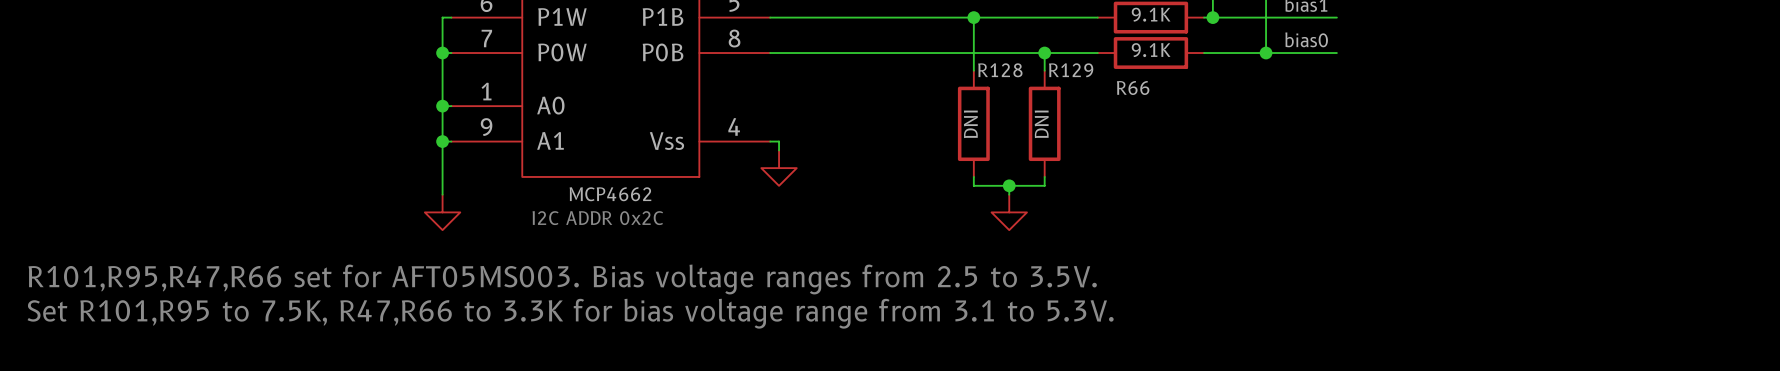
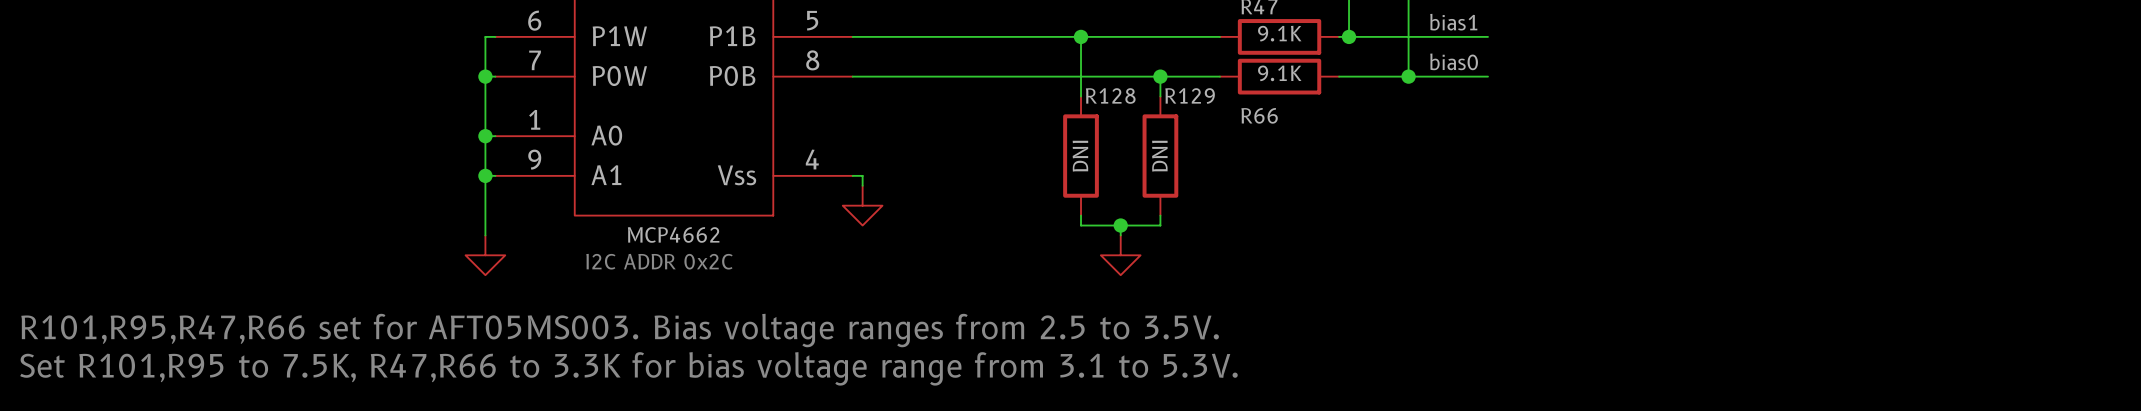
R128 text: none -> DNI (1080, 156)
R129 text: none -> DNI (1159, 156)
R128 value: DNI (970, 124) -> none
R129 value: DNI (1041, 124) -> none

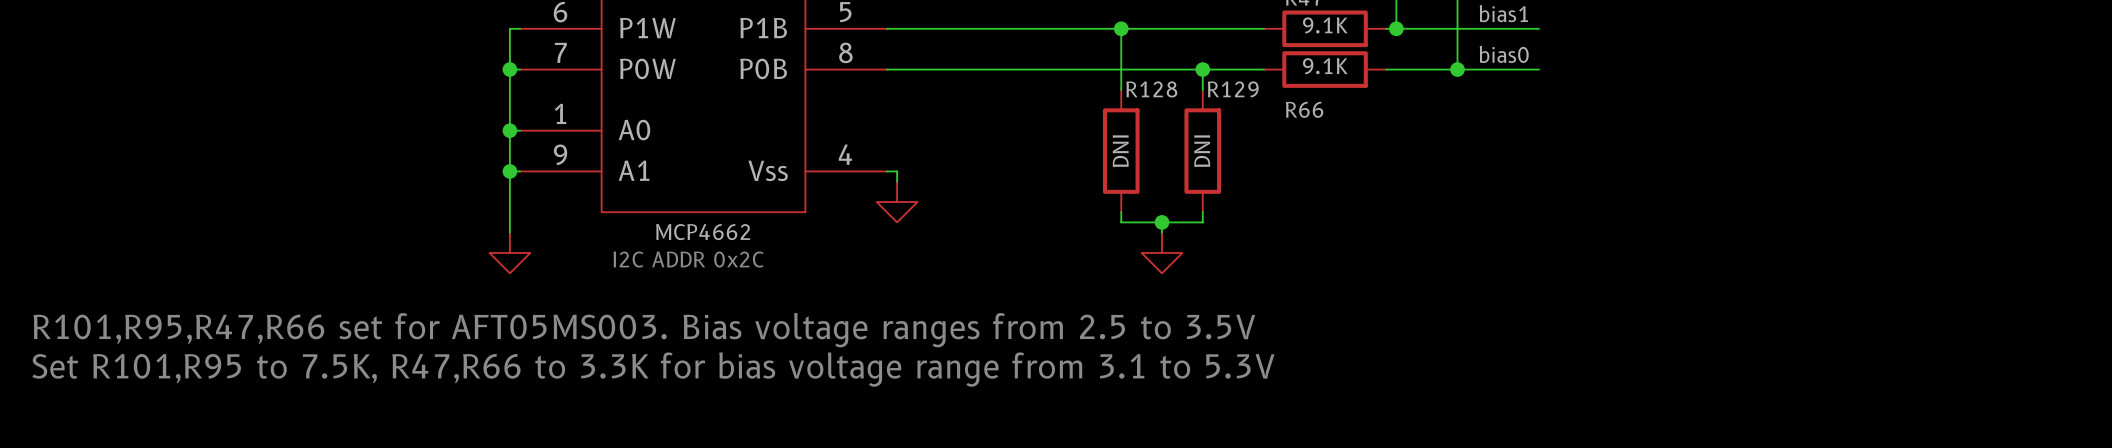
text: R101,R95,R47,R66 set for AFT05MS003. Bias voltage ranges from 2.5 to 3.5V. (620, 330) -> R101,R95,R47,R66 set for AFT05MS003. Bias voltage ranges from 2.5 to 3.5V (644, 330)
text: Set R101,R95 to 7.5K, R47,R66 to 3.3K for bias voltage range from 3.1 to 5.3V. (628, 368) -> Set R101,R95 to 7.5K, R47,R66 to 3.3K for bias voltage range from 3.1 to 5.3V (653, 369)

